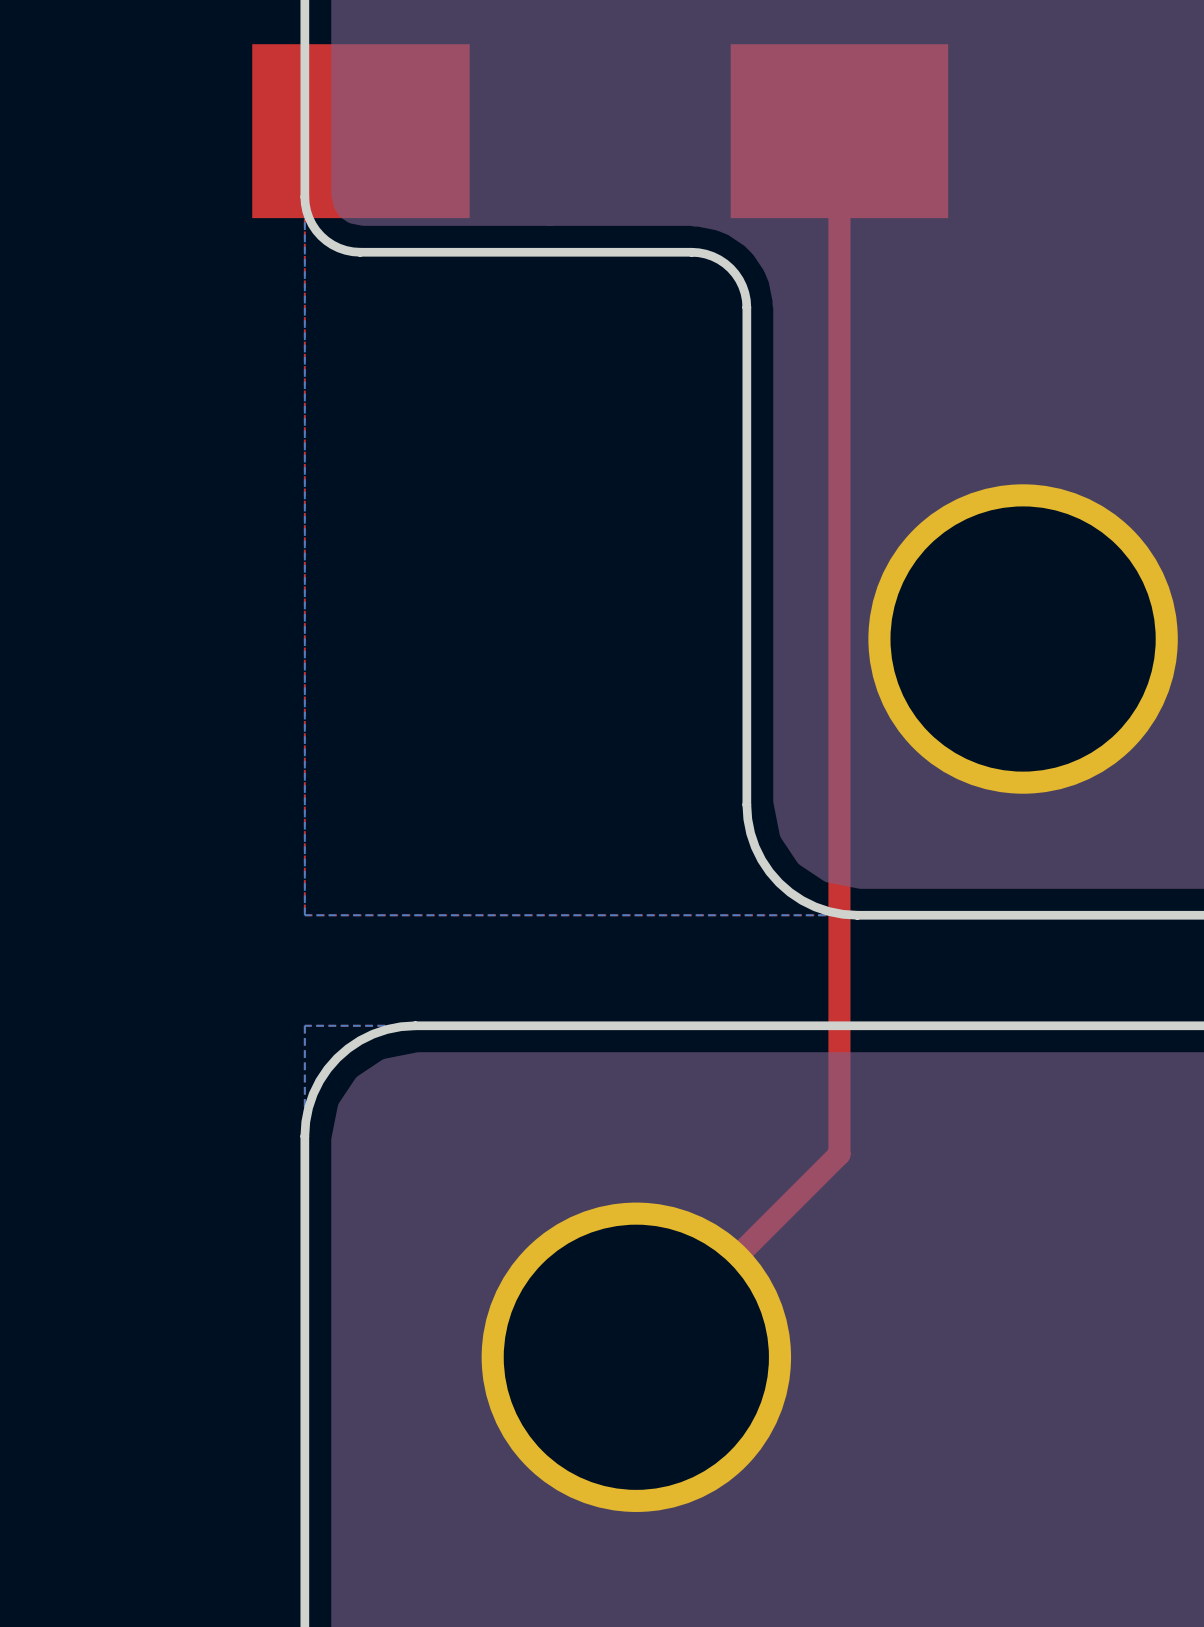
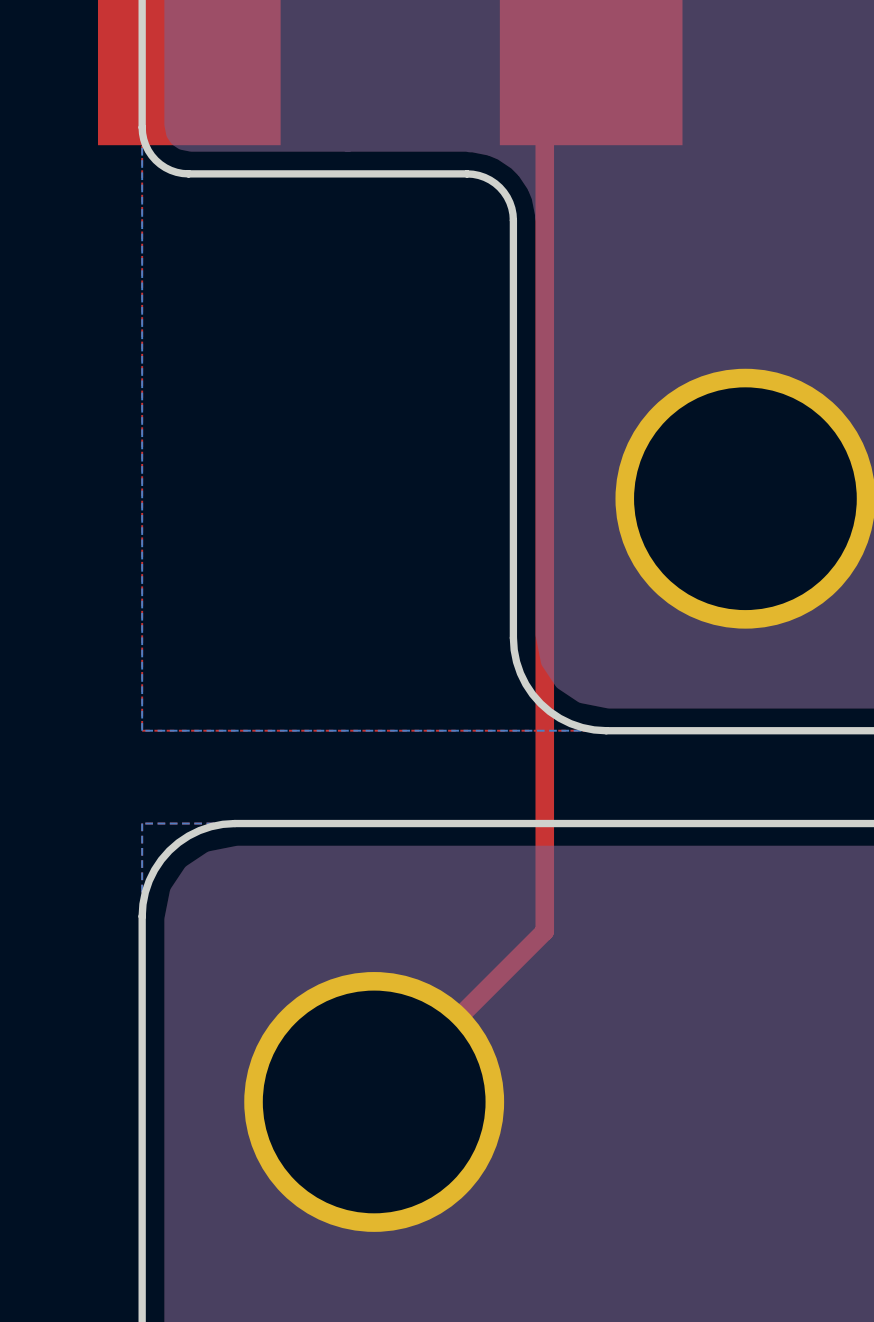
top track: (839, 131) (839, 1154) (636, 1357) -> (544, 72) (544, 931) (374, 1101)
part position: (636, 1357) -> (374, 1101)

